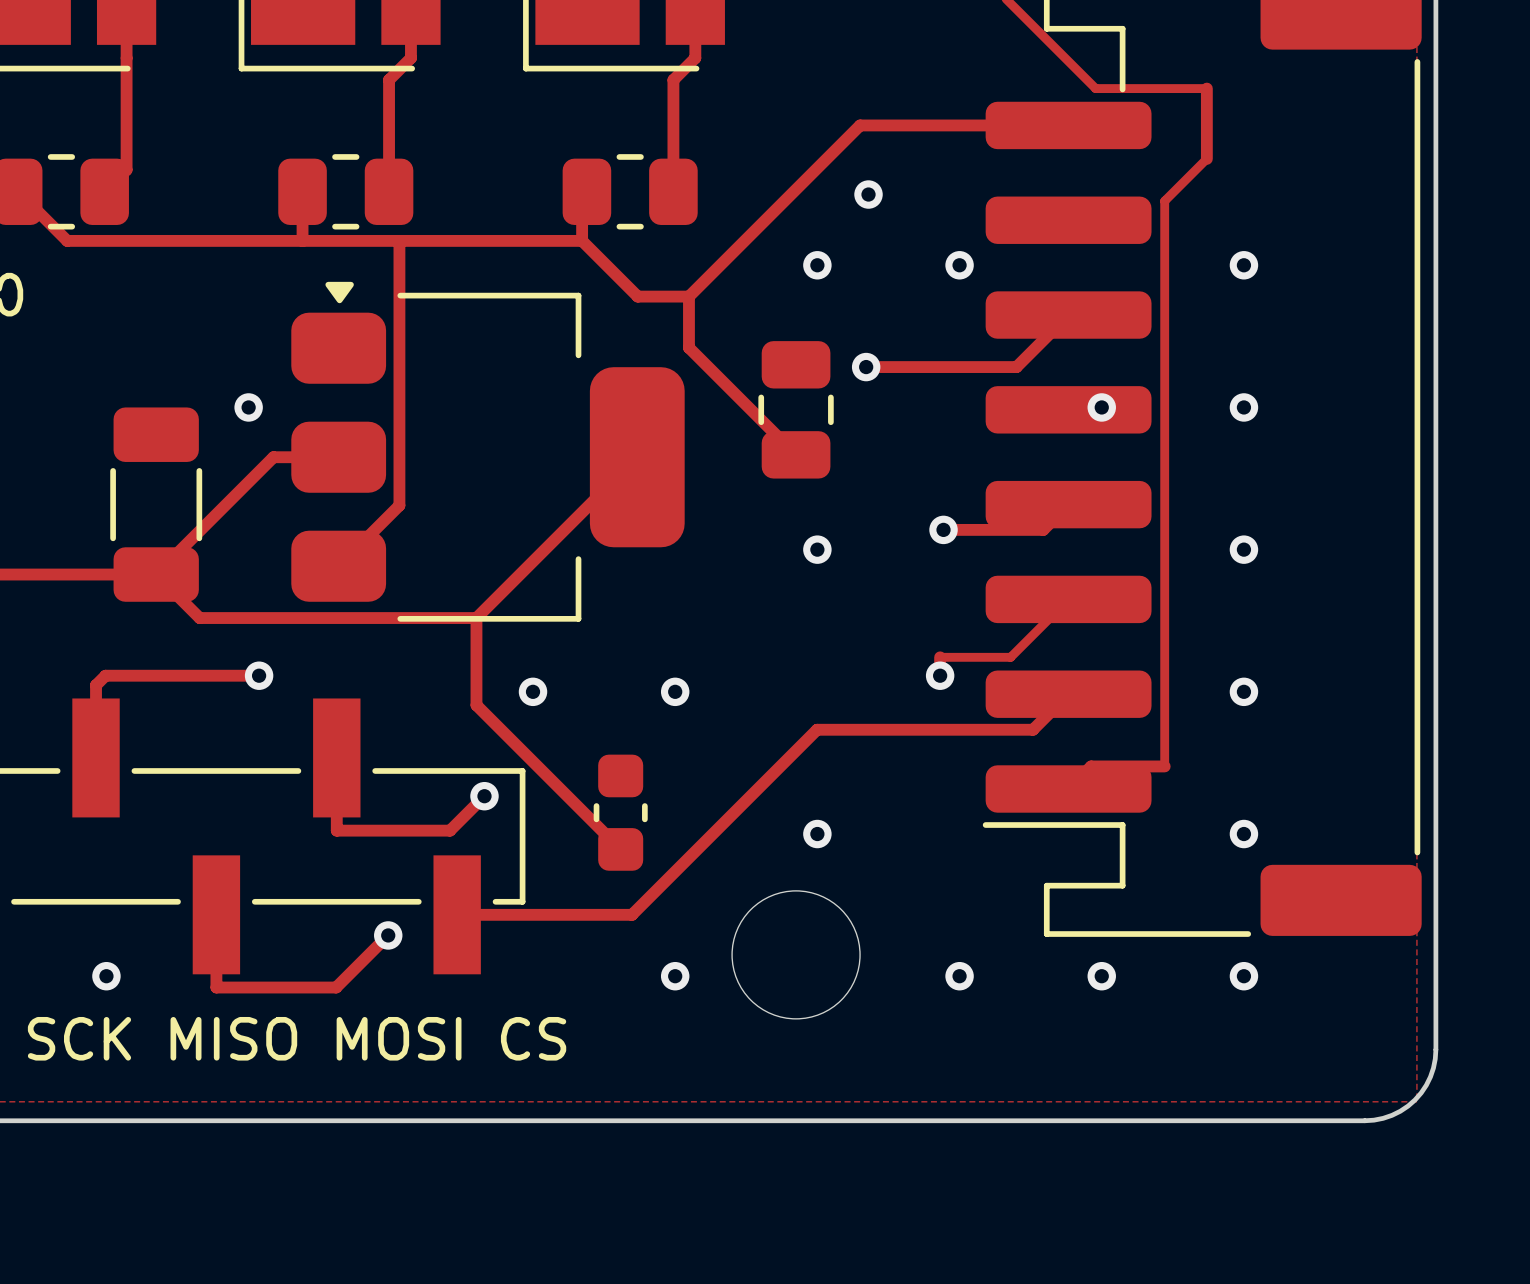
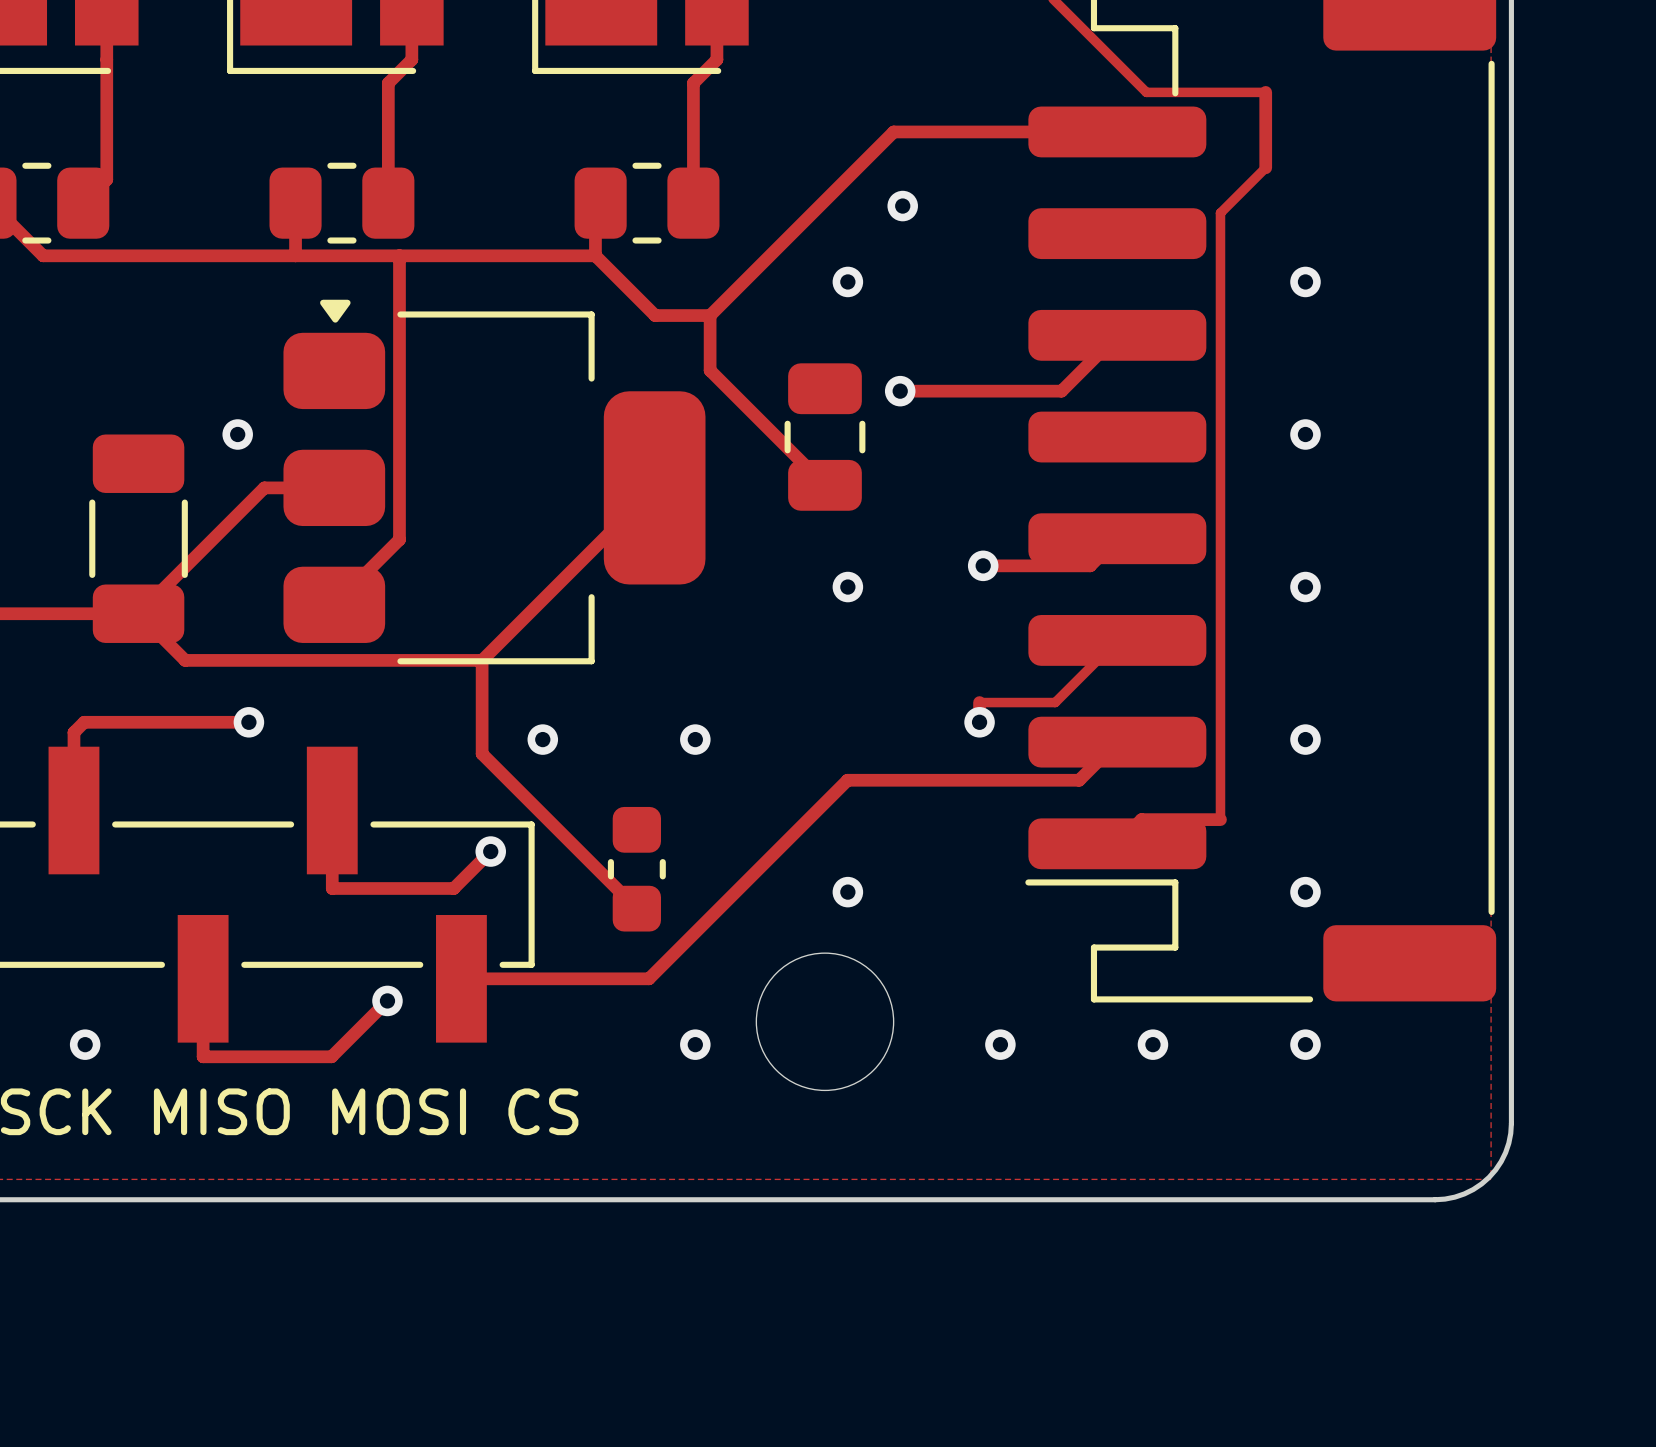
via: (959, 265) -> none
via: (1101, 407) -> none

